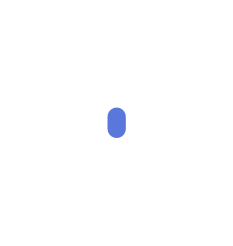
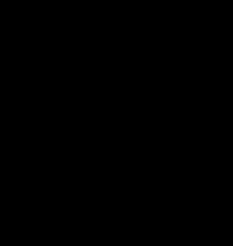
bottom track: (116, 116) (116, 128) -> none

